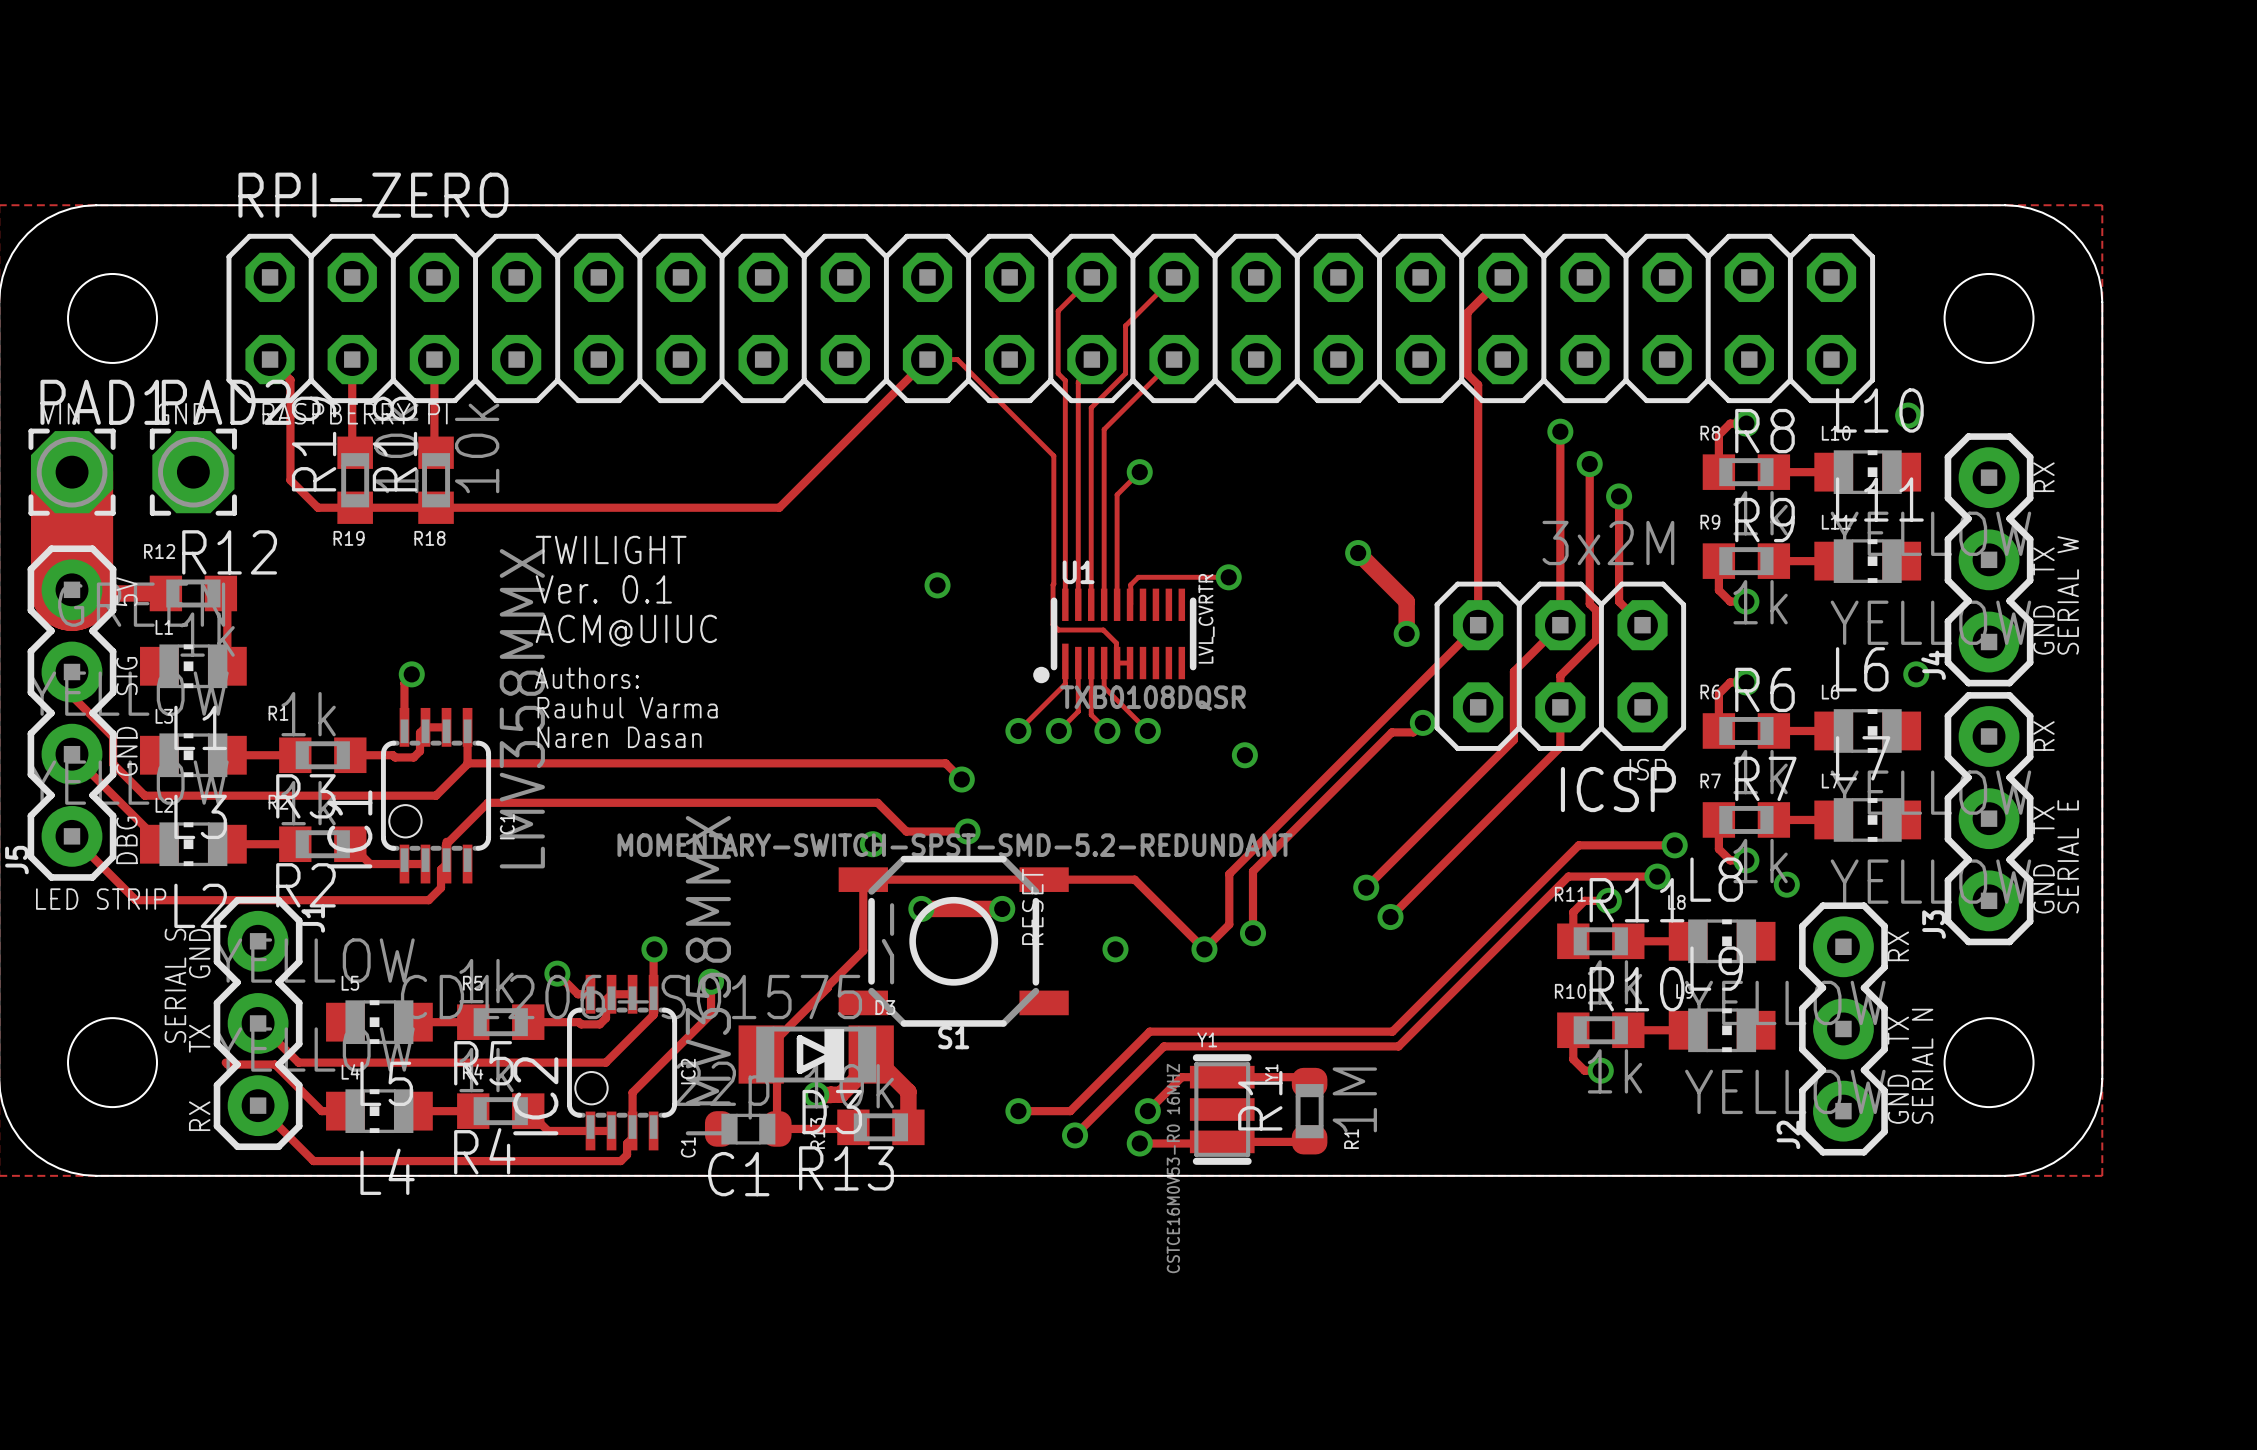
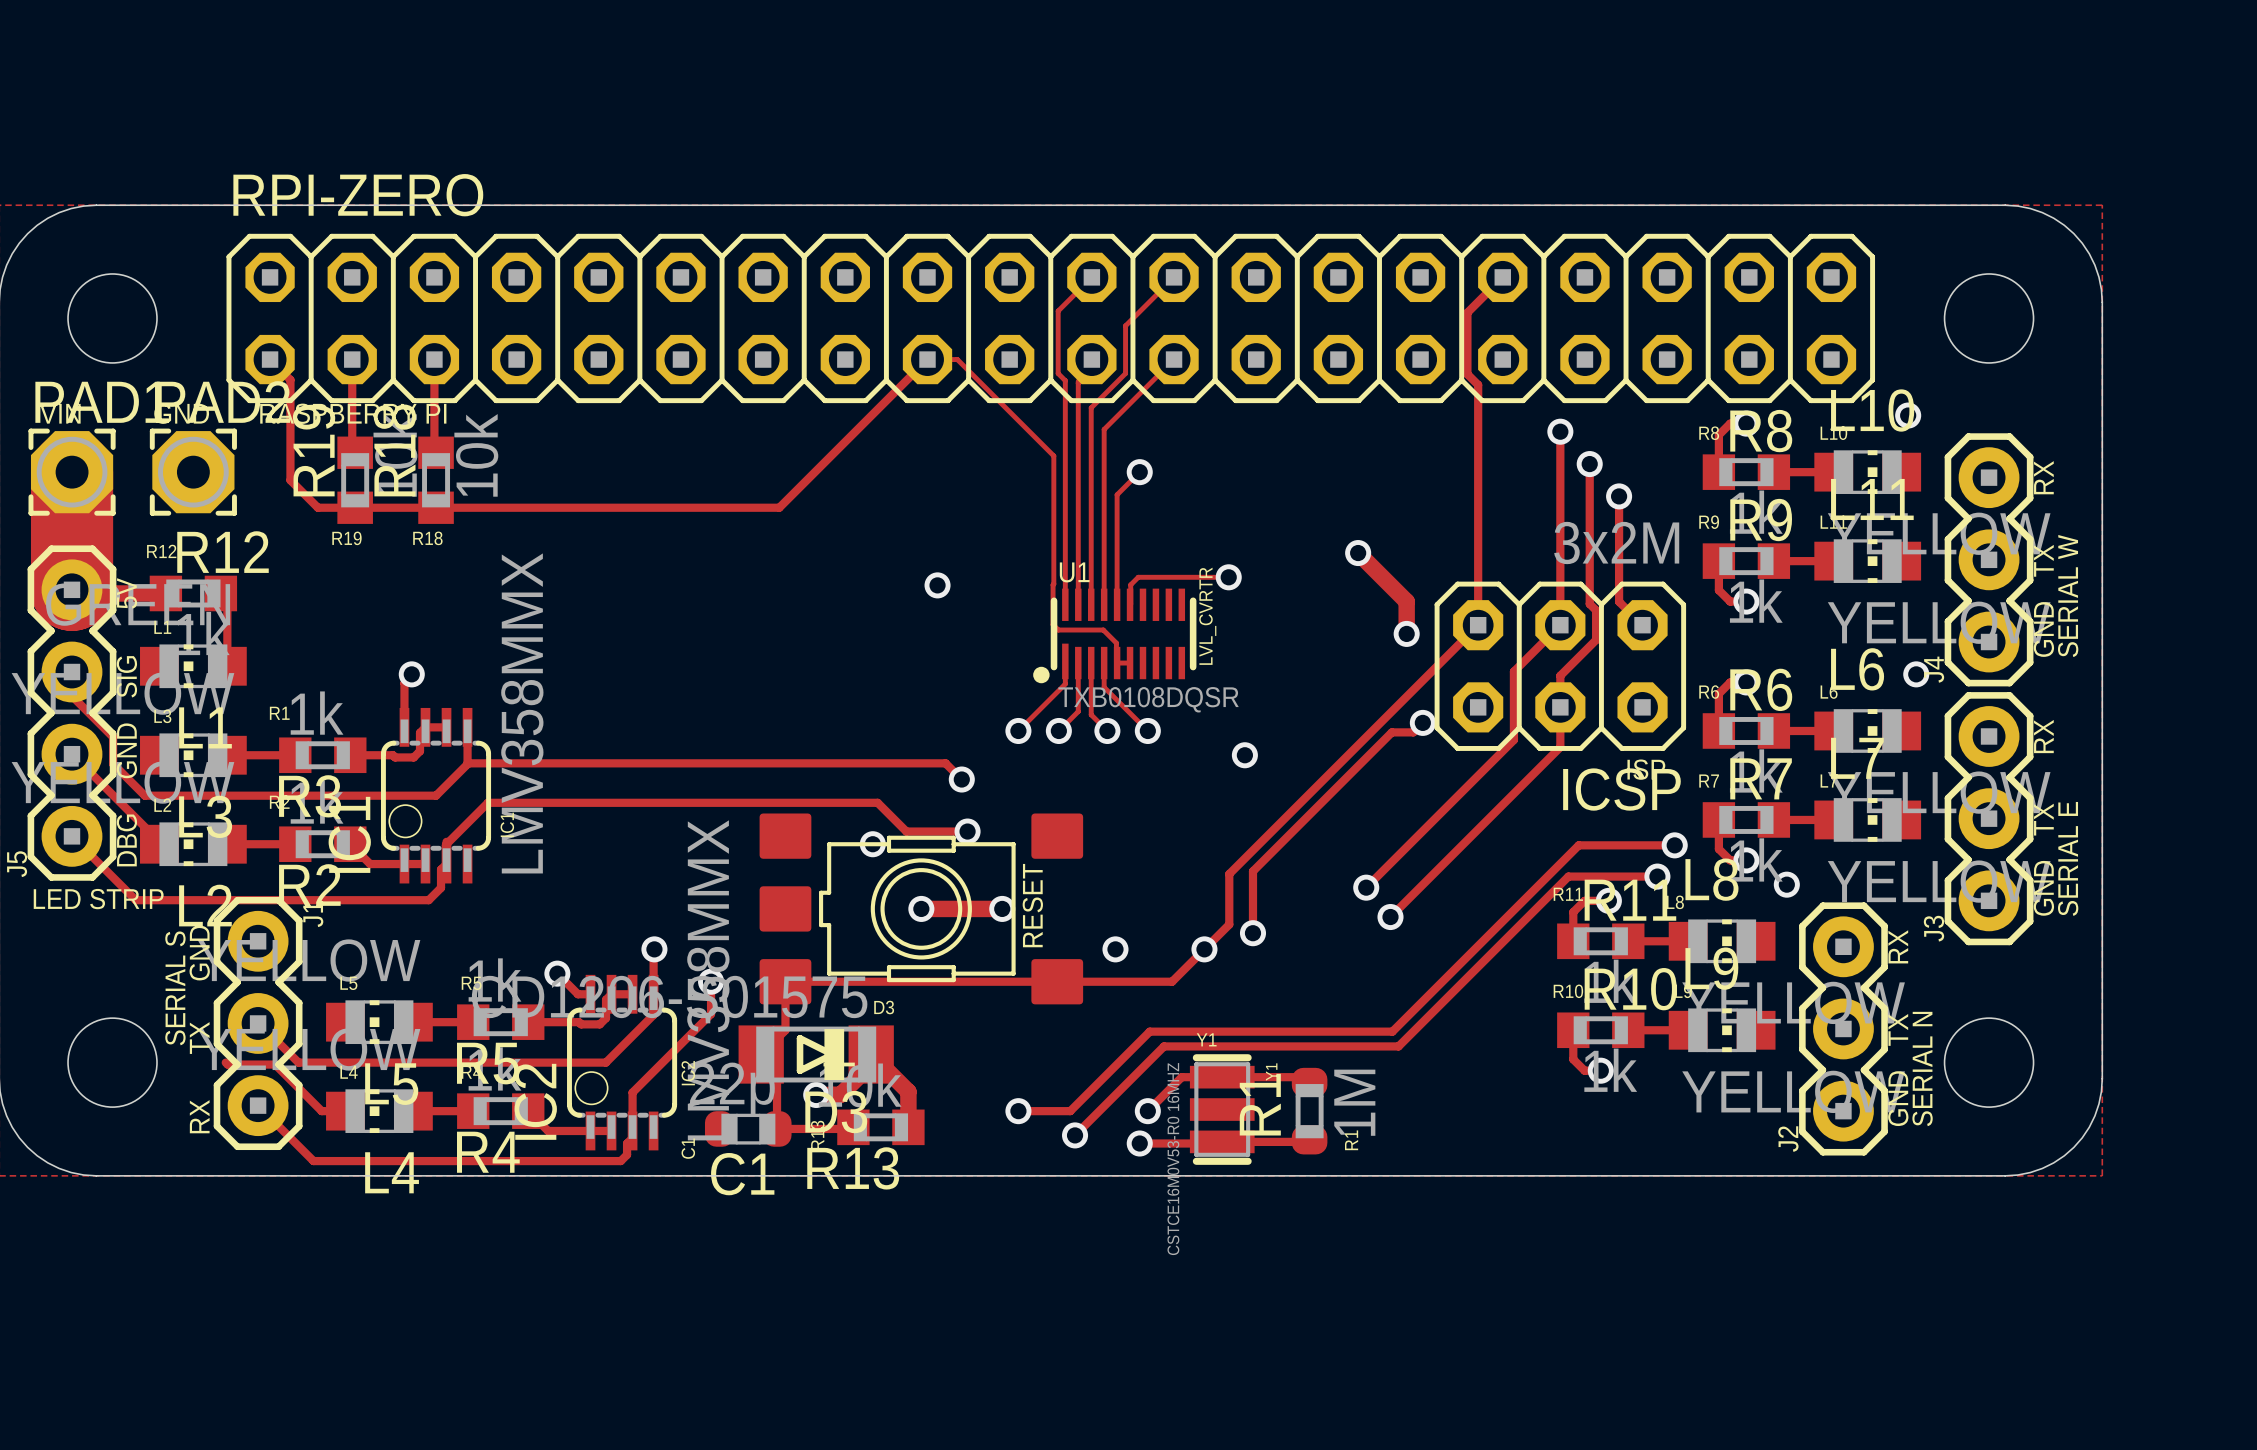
text: TWILIGHT (611, 549) -> none
text: Ver. 0.1 (603, 589) -> none
text: ACM@UIUC (626, 630) -> none
text: Authors: (586, 678) -> none
text: Rauhul Varma (627, 707) -> none
text: Naren Dasan (619, 737) -> none
part: none -> (921, 908)
S1: MOMENTARY-SWITCH-SPST-SMD-5.2-REDUNDANT (953, 941) -> none
track: (1204, 949) (1134, 879) (863, 879) (863, 950) (785, 1030) -> (1204, 949) (1172, 981) (785, 981) (785, 1030)

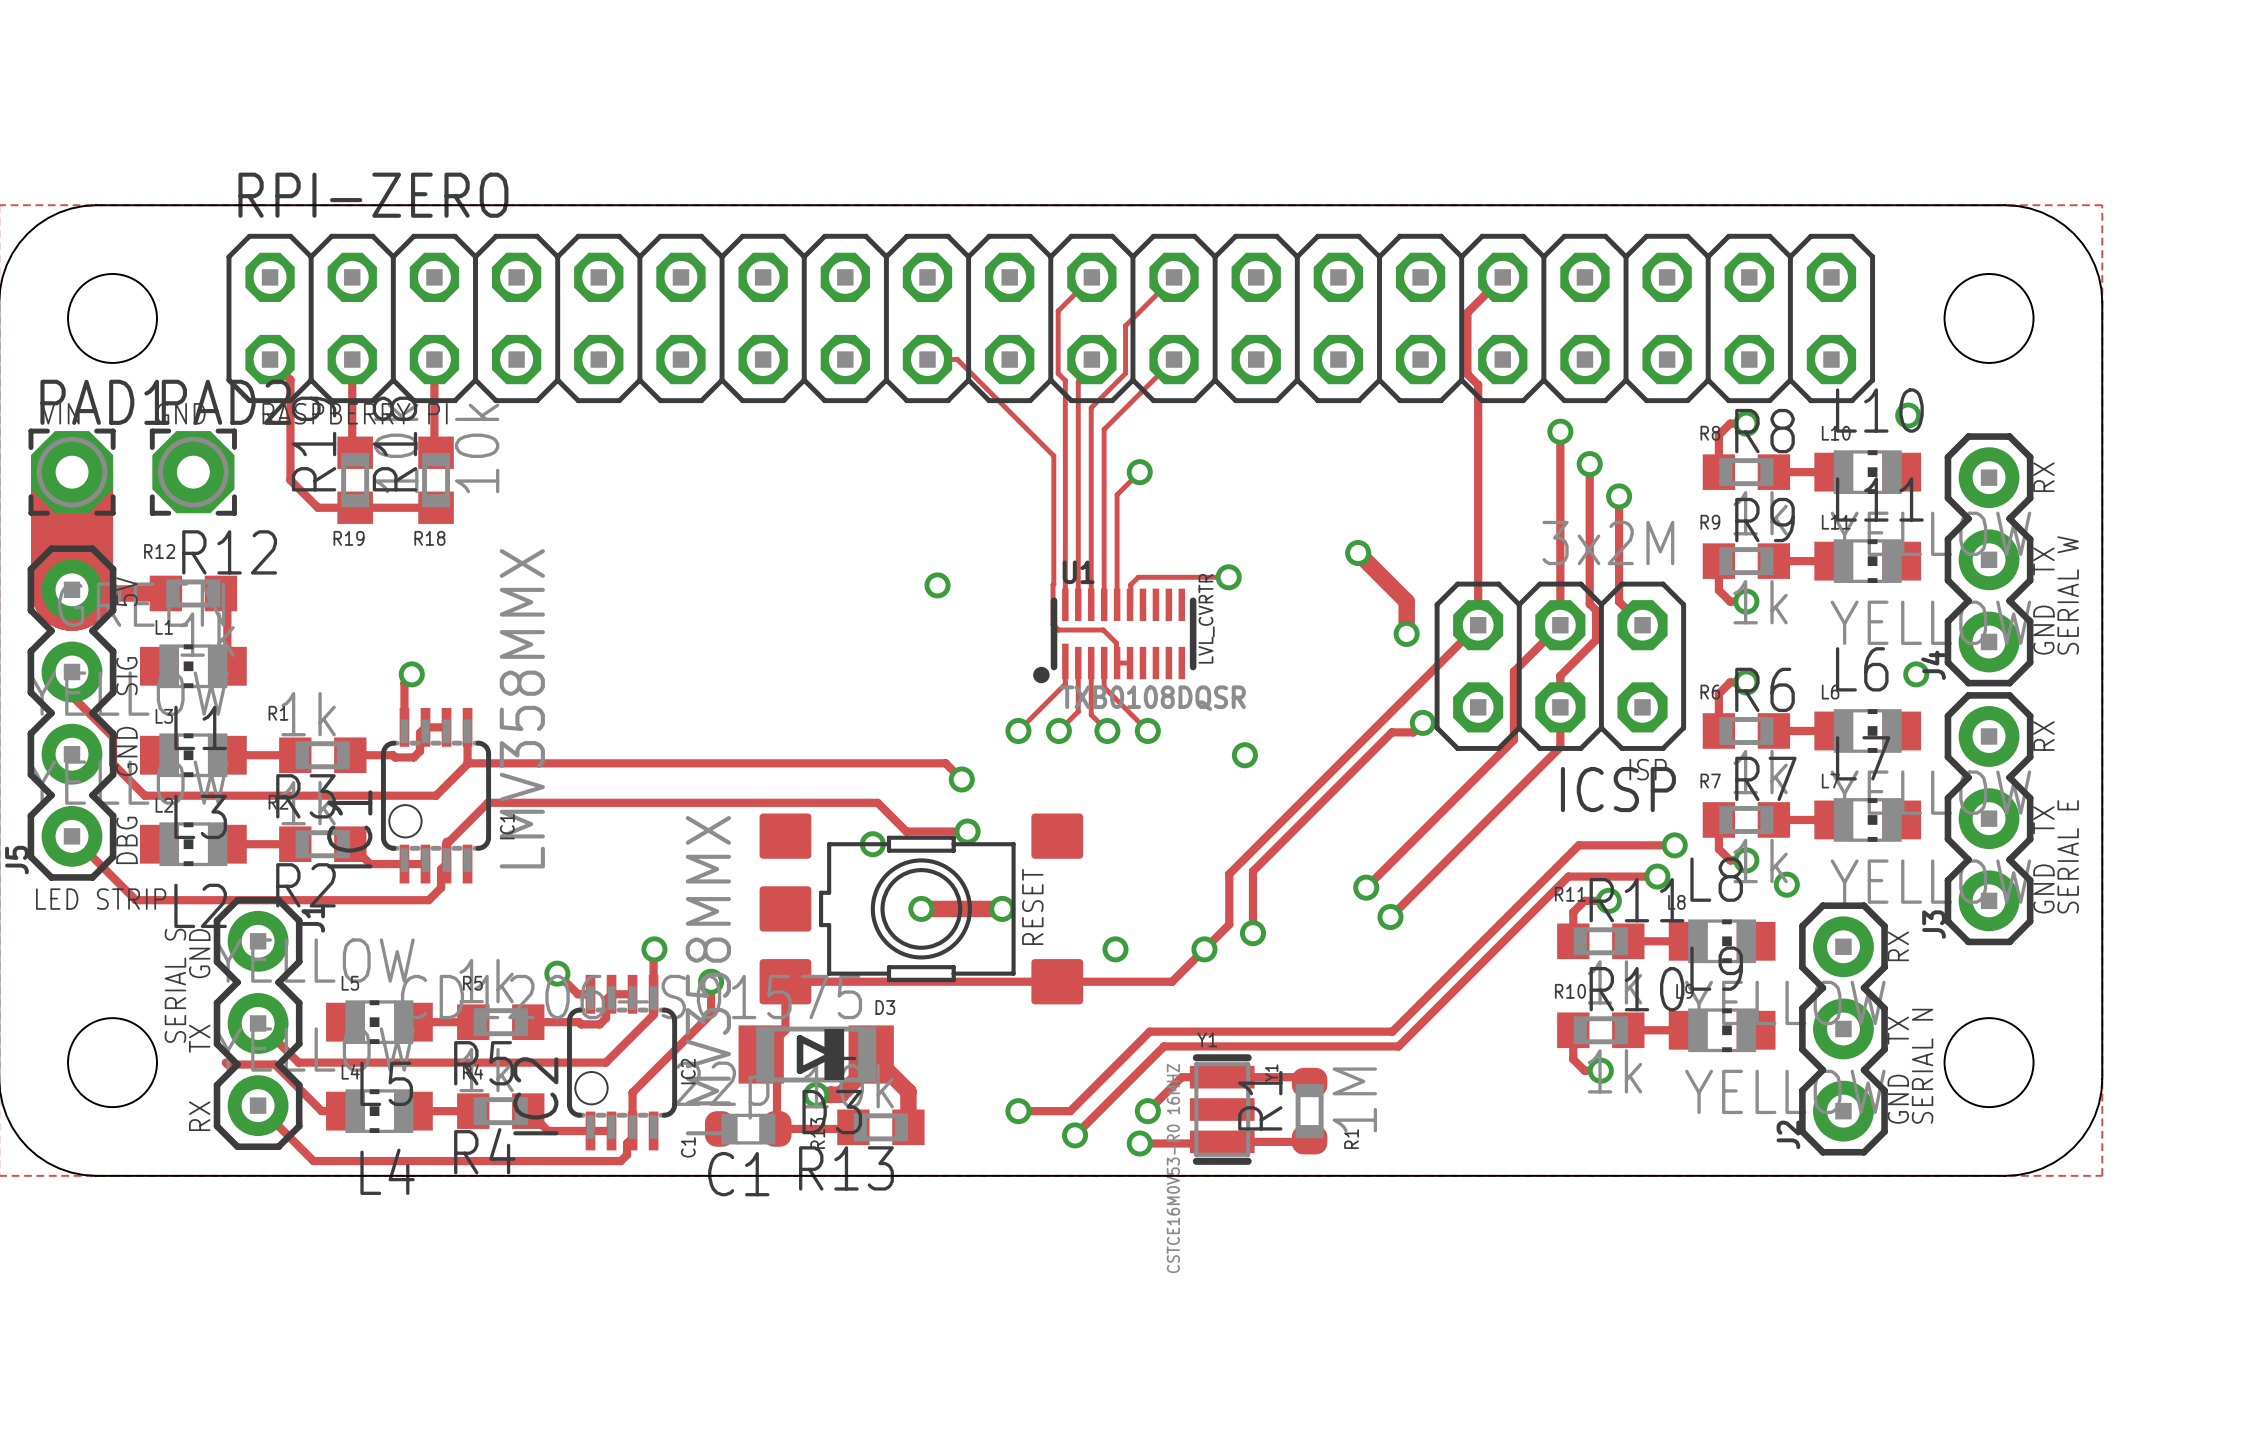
track: (927, 359) (779, 507) (436, 507) -> none
track: (71, 754) (159, 841) (159, 844) -> none

